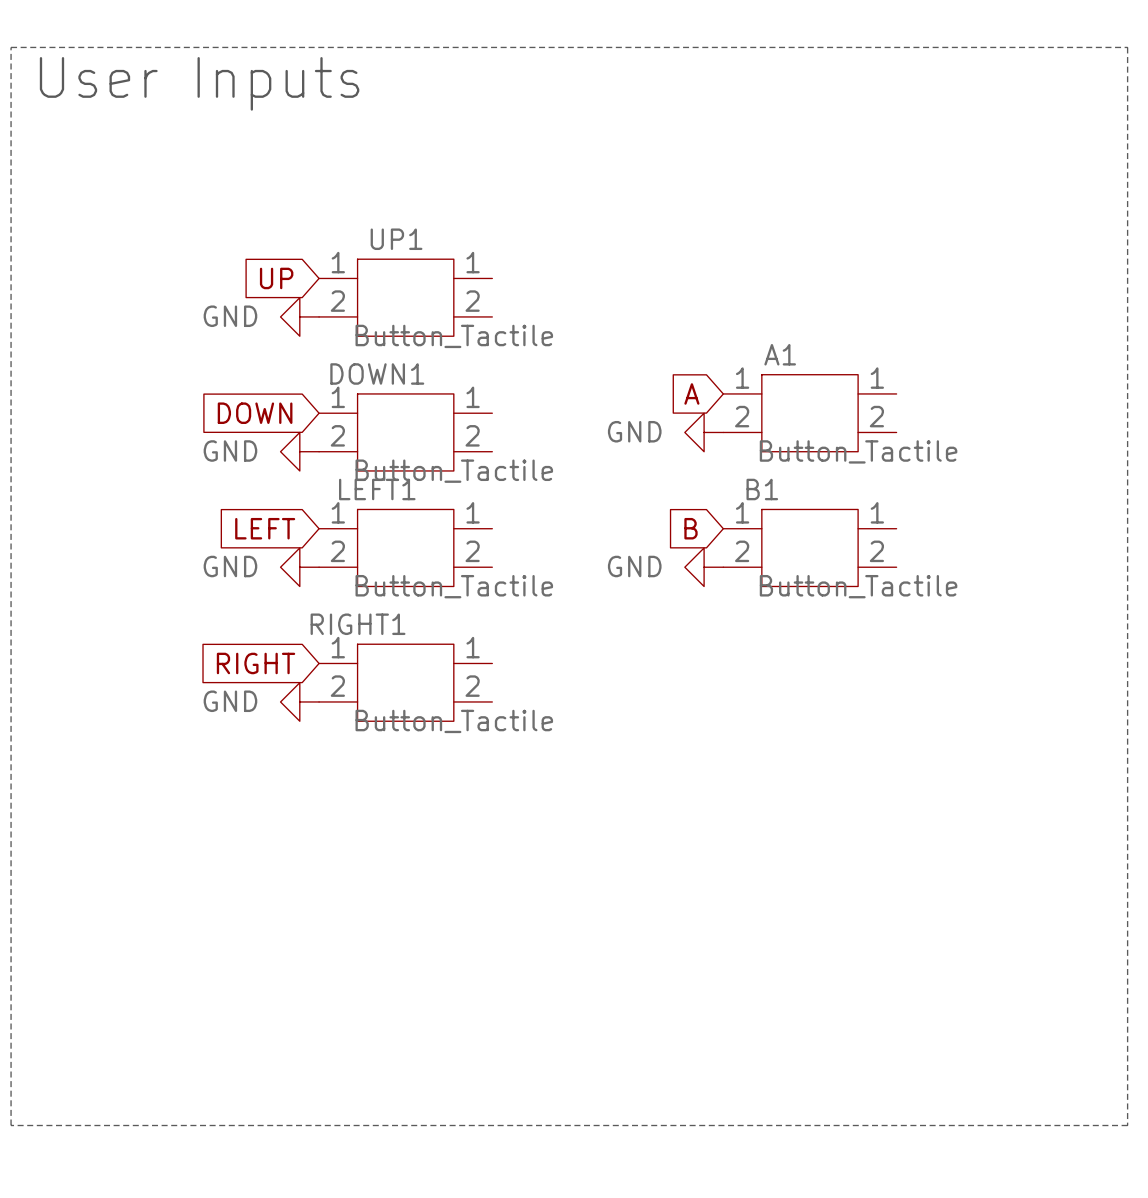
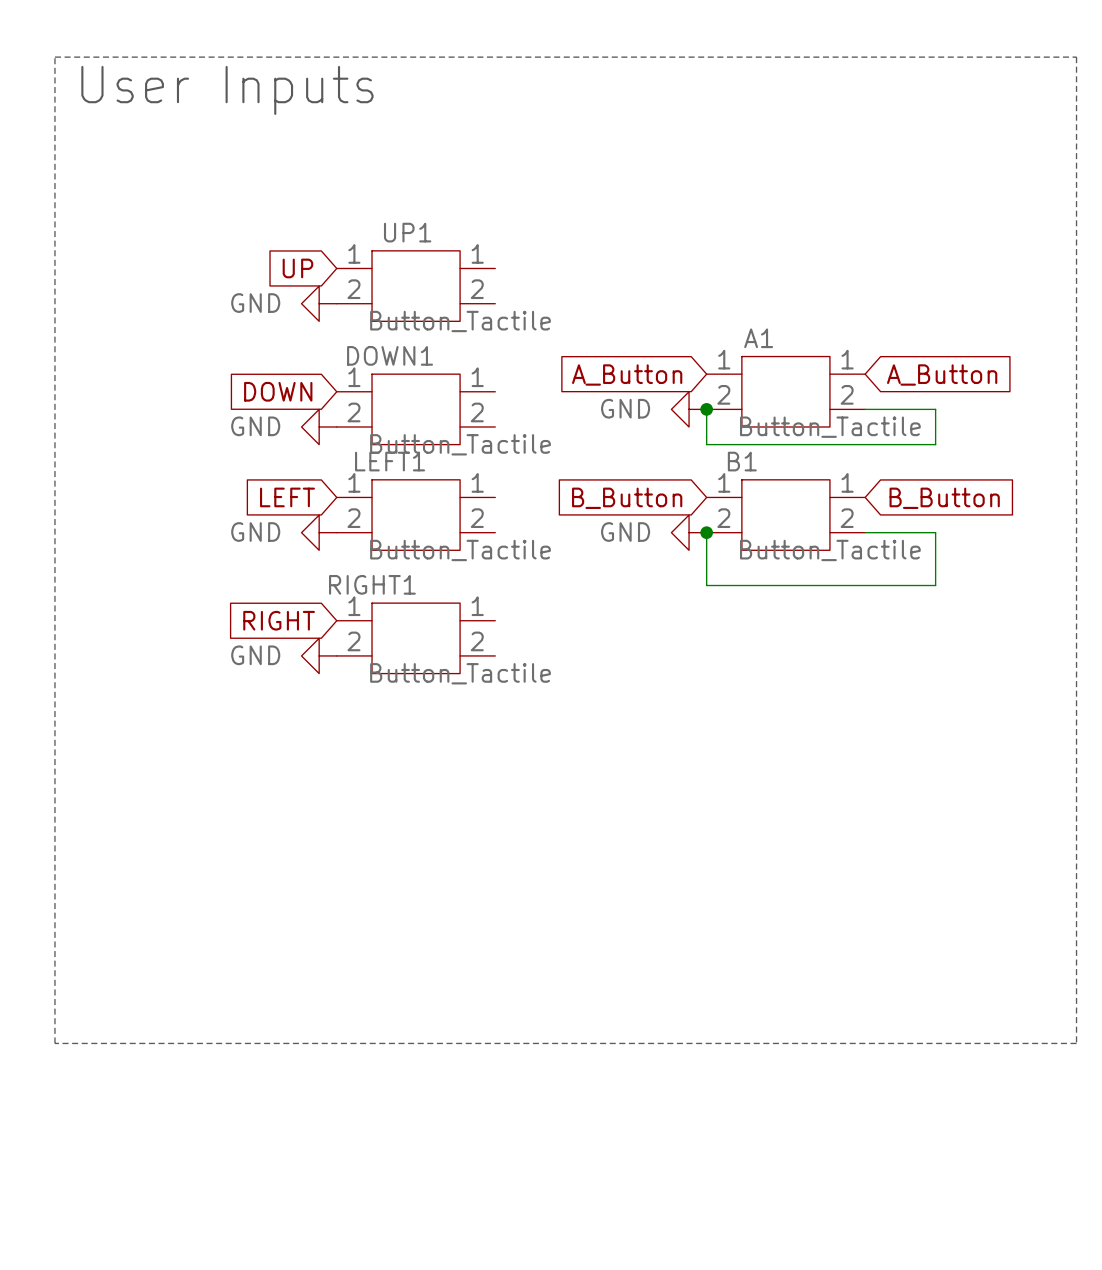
global label: A (691, 393) -> A_Button (627, 374)
global label: none -> A_Button (942, 374)
wire: none -> (706, 409) (706, 444) (935, 444) (935, 409) (865, 409)
junction: none -> (706, 409)
global label: B (690, 528) -> B_Button (627, 498)
global label: none -> B_Button (944, 498)
wire: none -> (706, 532) (706, 585) (935, 585) (935, 532) (865, 532)
junction: none -> (706, 532)

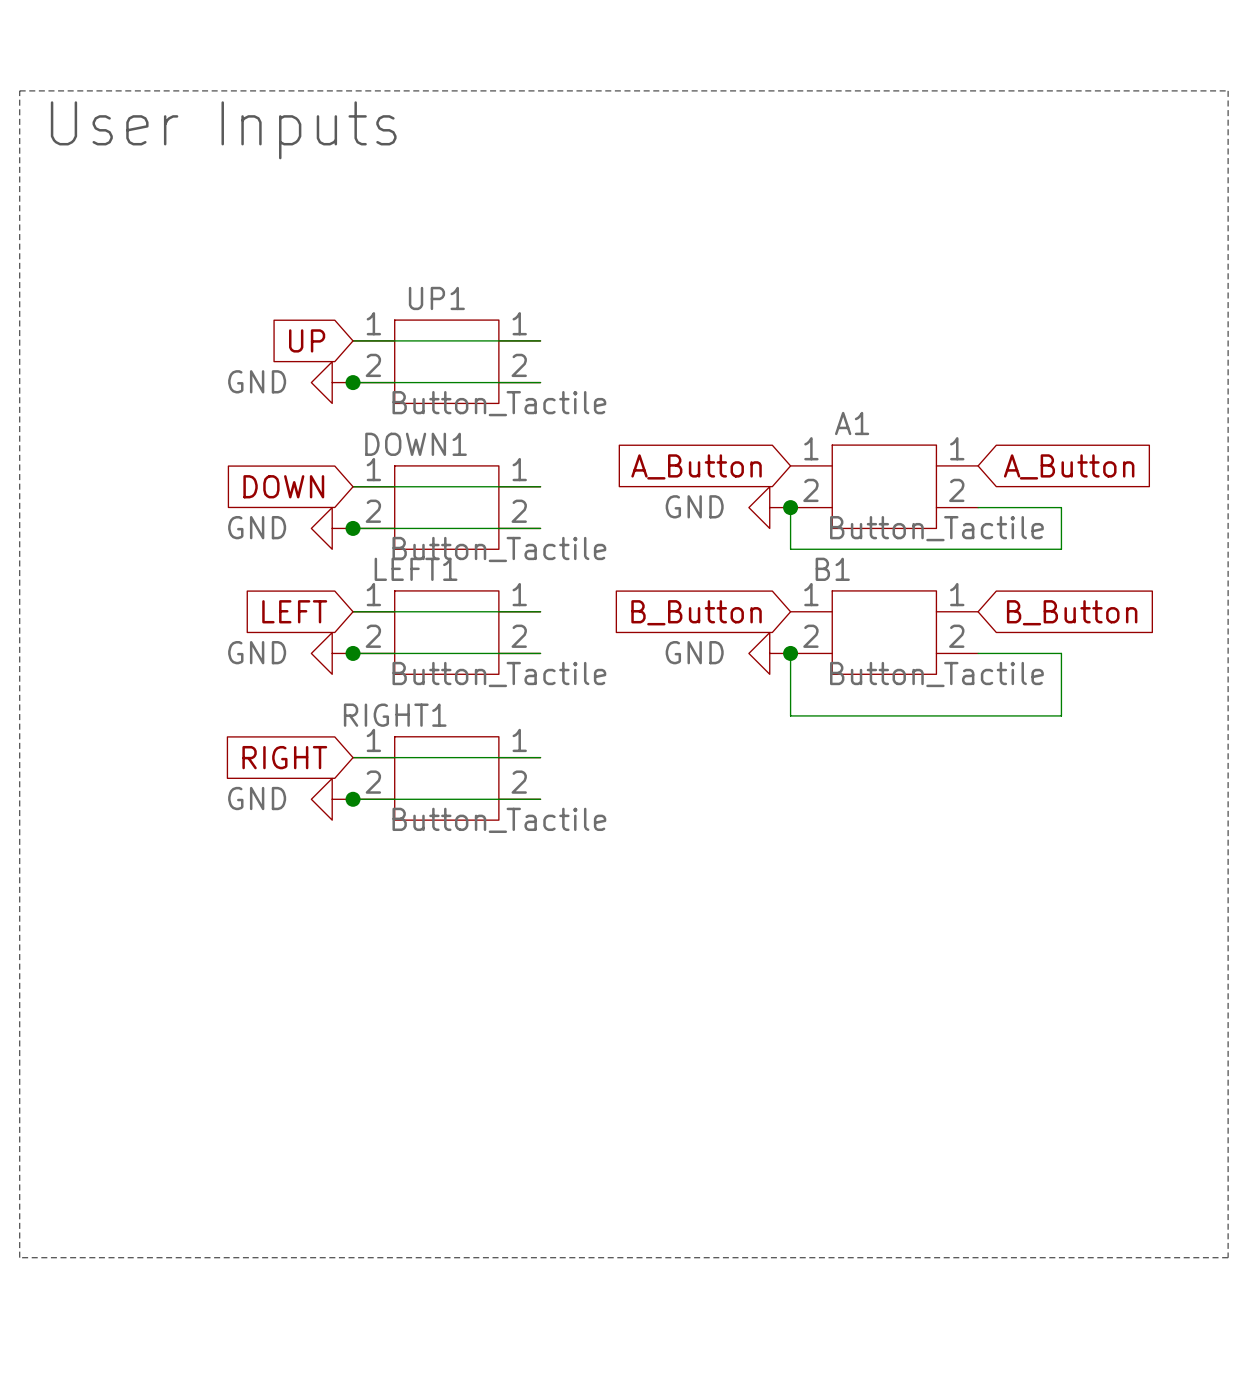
wire: none -> (353, 340) (540, 340)
wire: none -> (353, 382) (540, 382)
junction: none -> (353, 382)
wire: none -> (353, 486) (540, 486)
wire: none -> (353, 528) (540, 528)
junction: none -> (353, 528)
wire: none -> (353, 611) (540, 611)
wire: none -> (353, 653) (540, 653)
junction: none -> (353, 653)
wire: none -> (353, 757) (540, 757)
wire: none -> (353, 799) (540, 799)
junction: none -> (353, 799)

